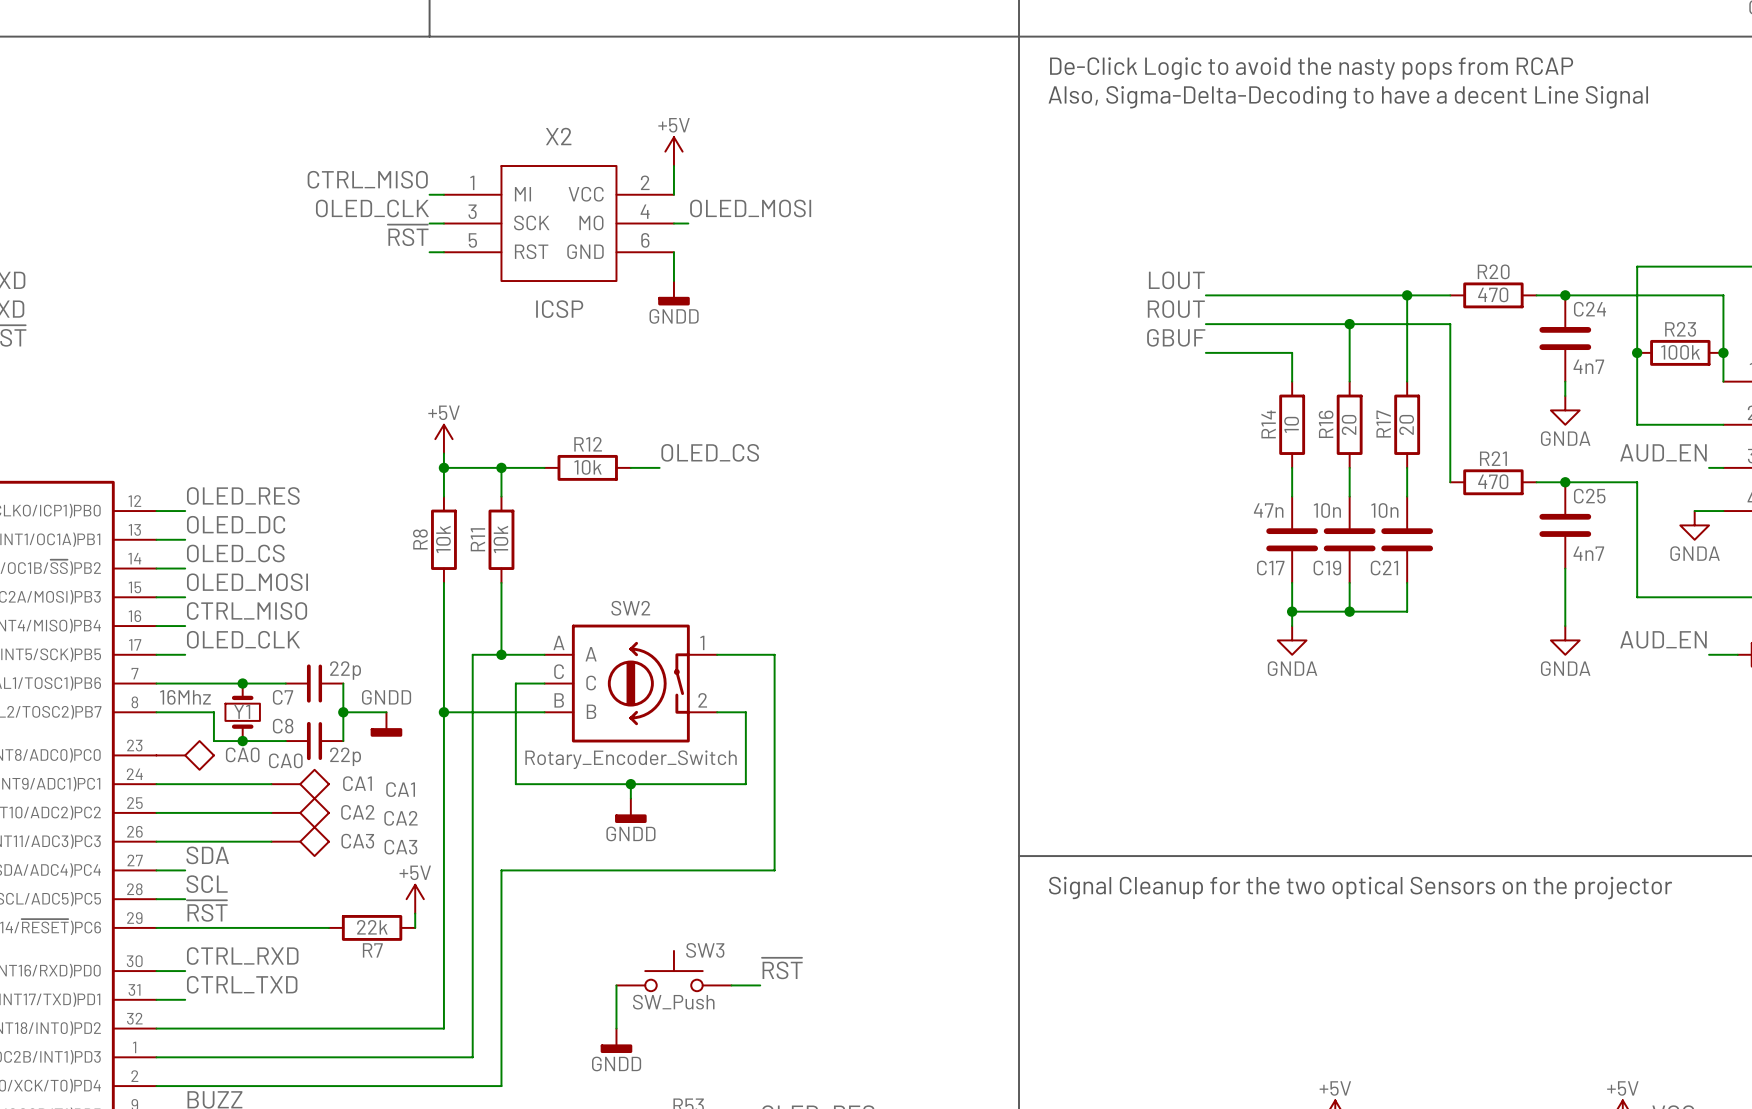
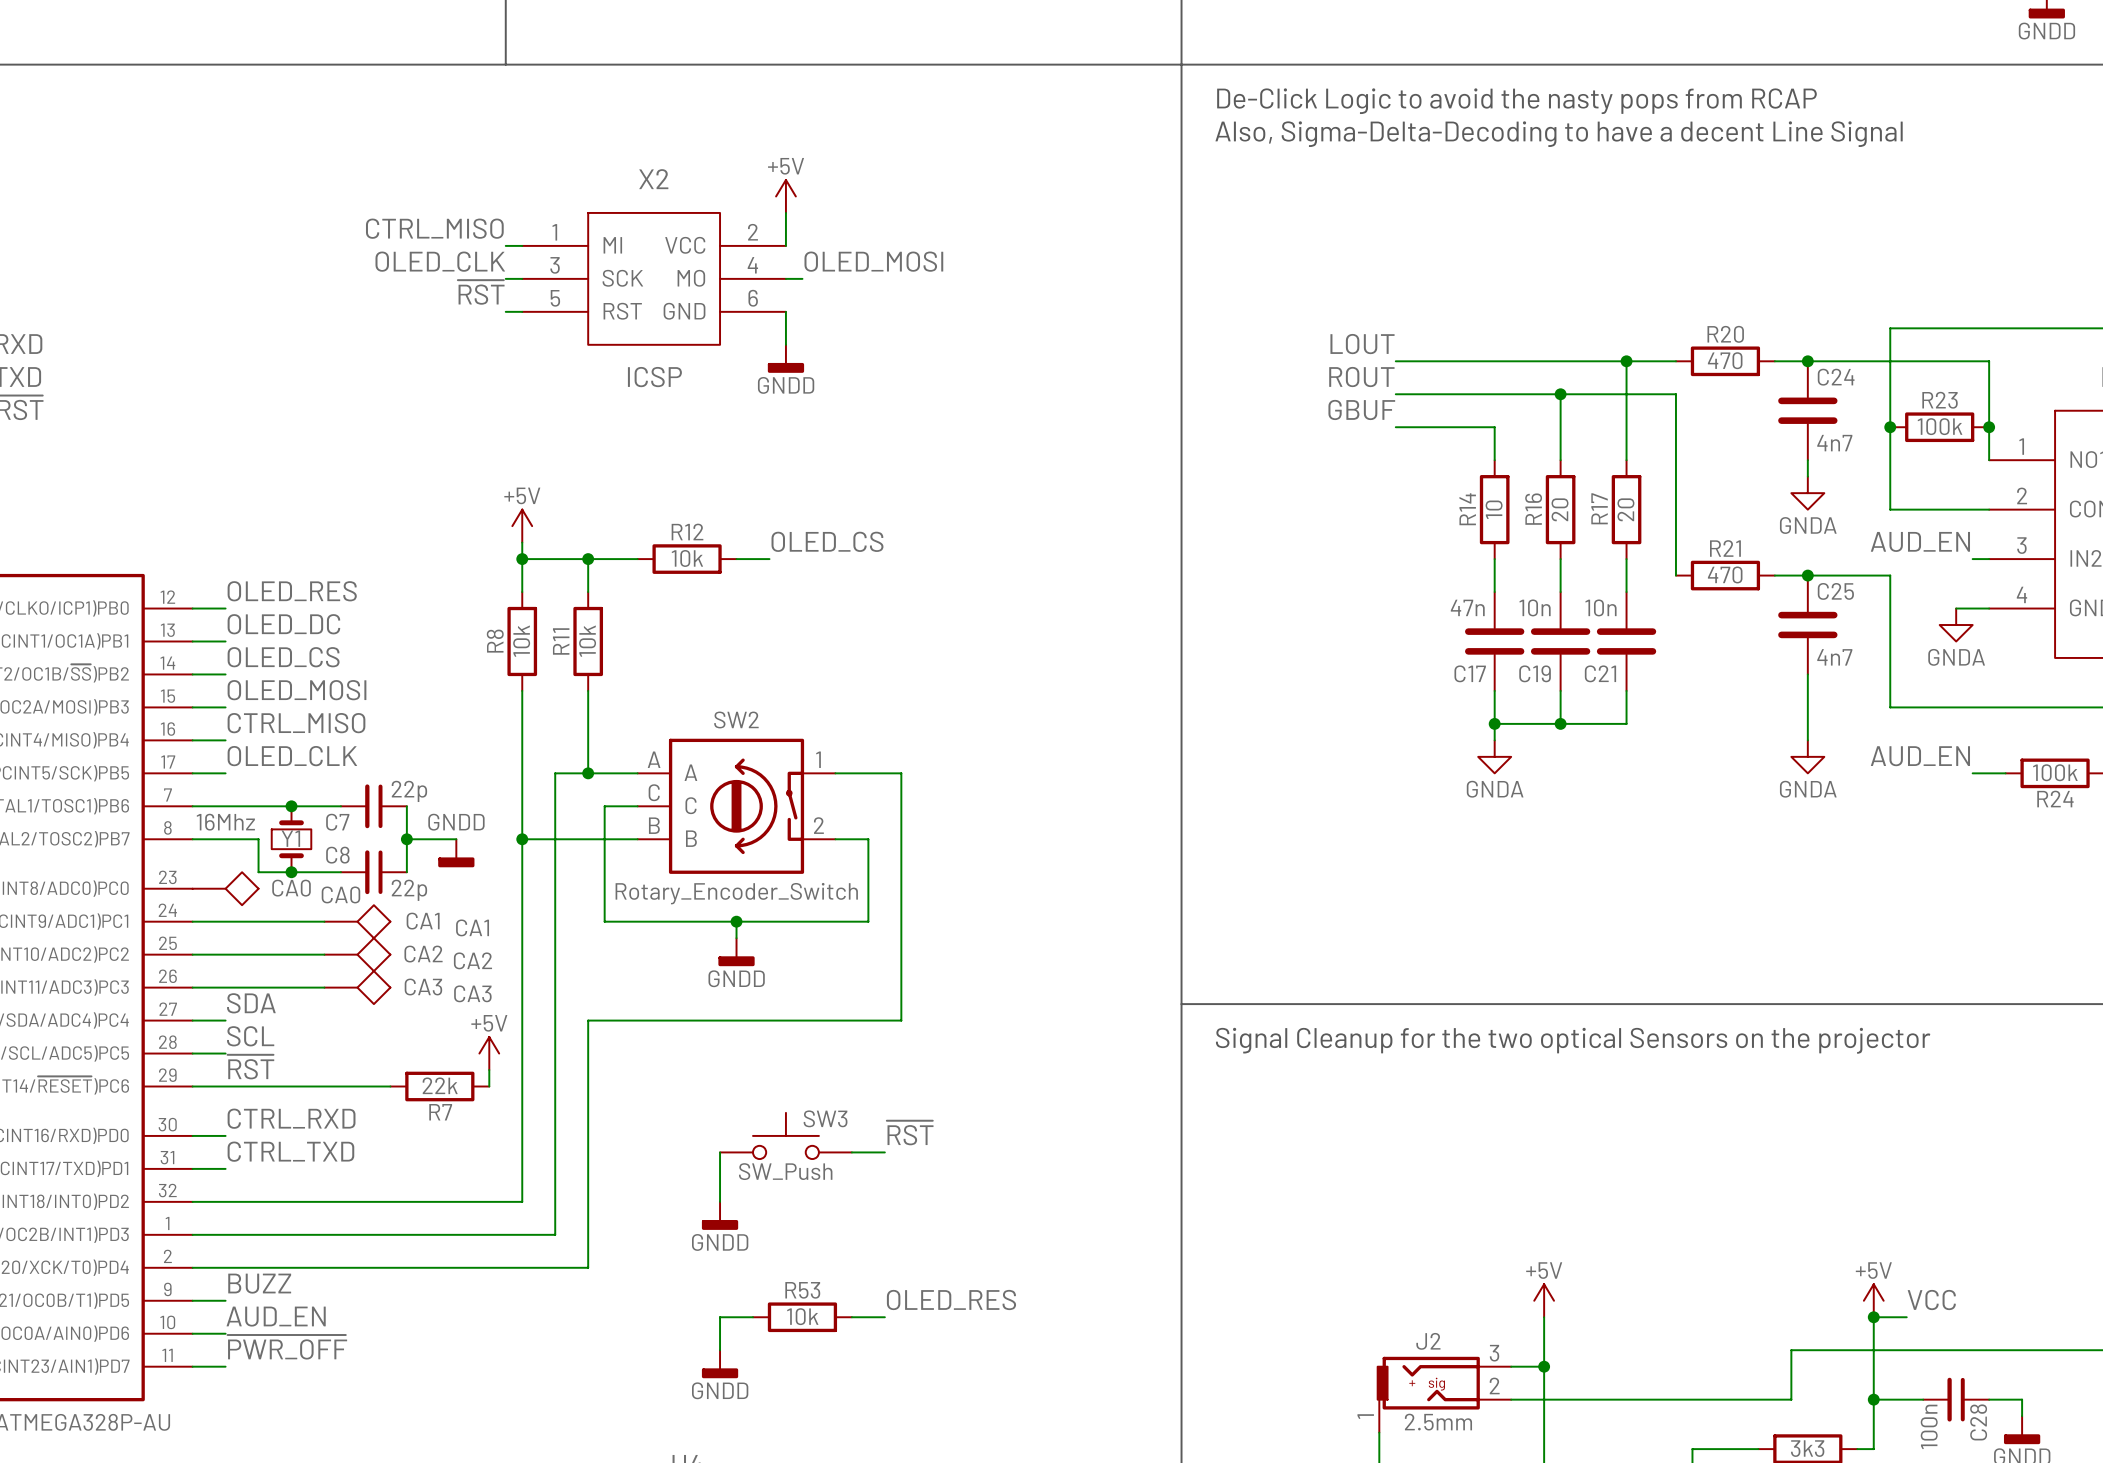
SW3 name position: SW3 (705, 950) -> SW3 (825, 1118)

